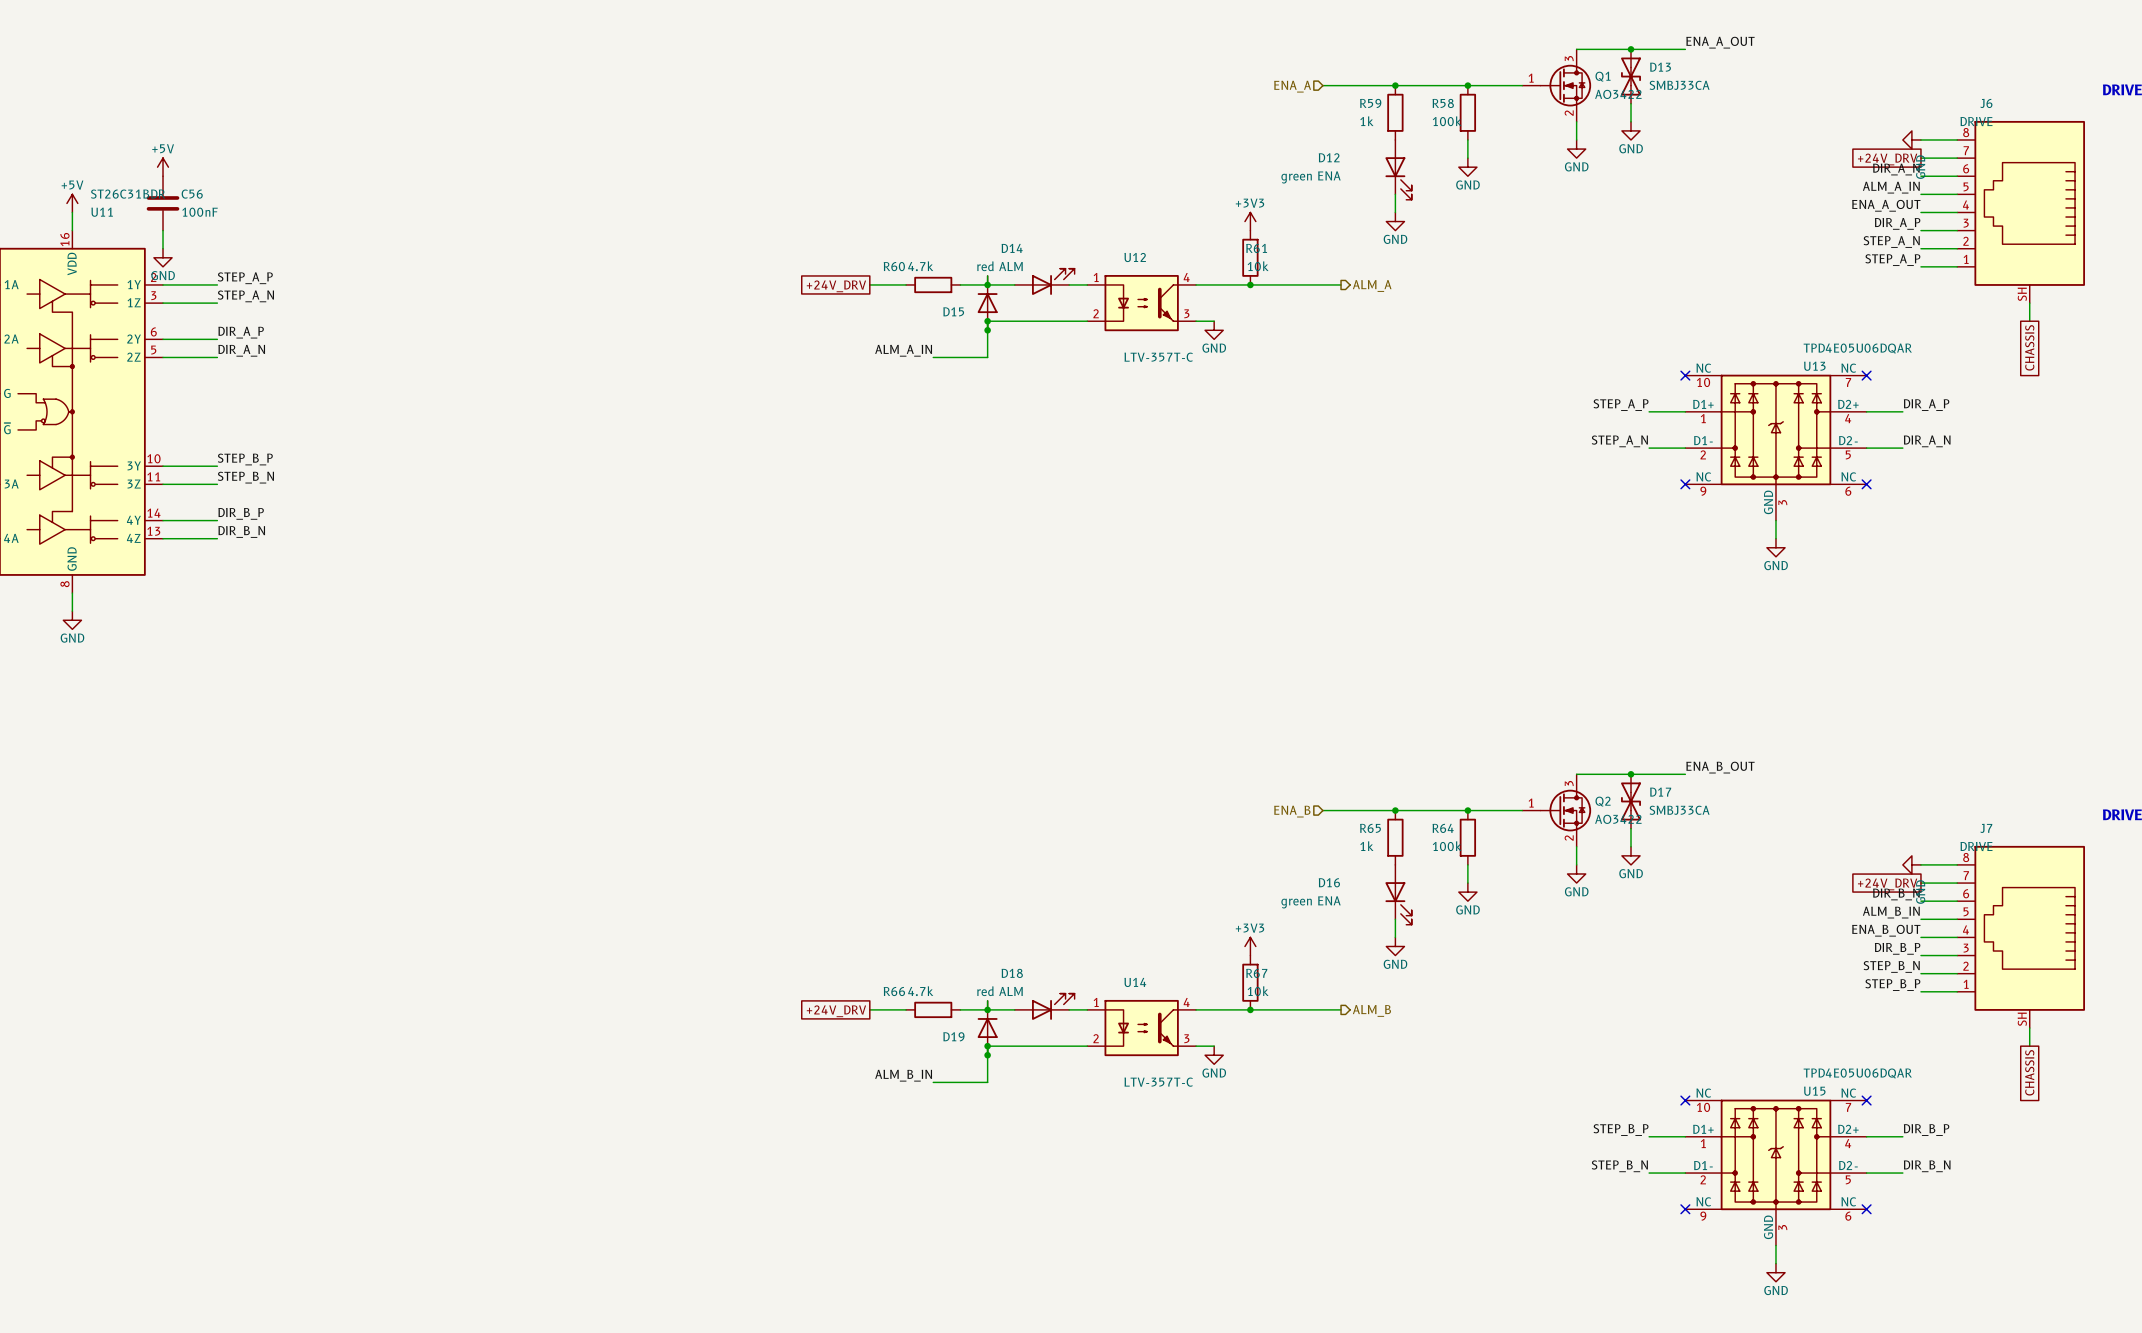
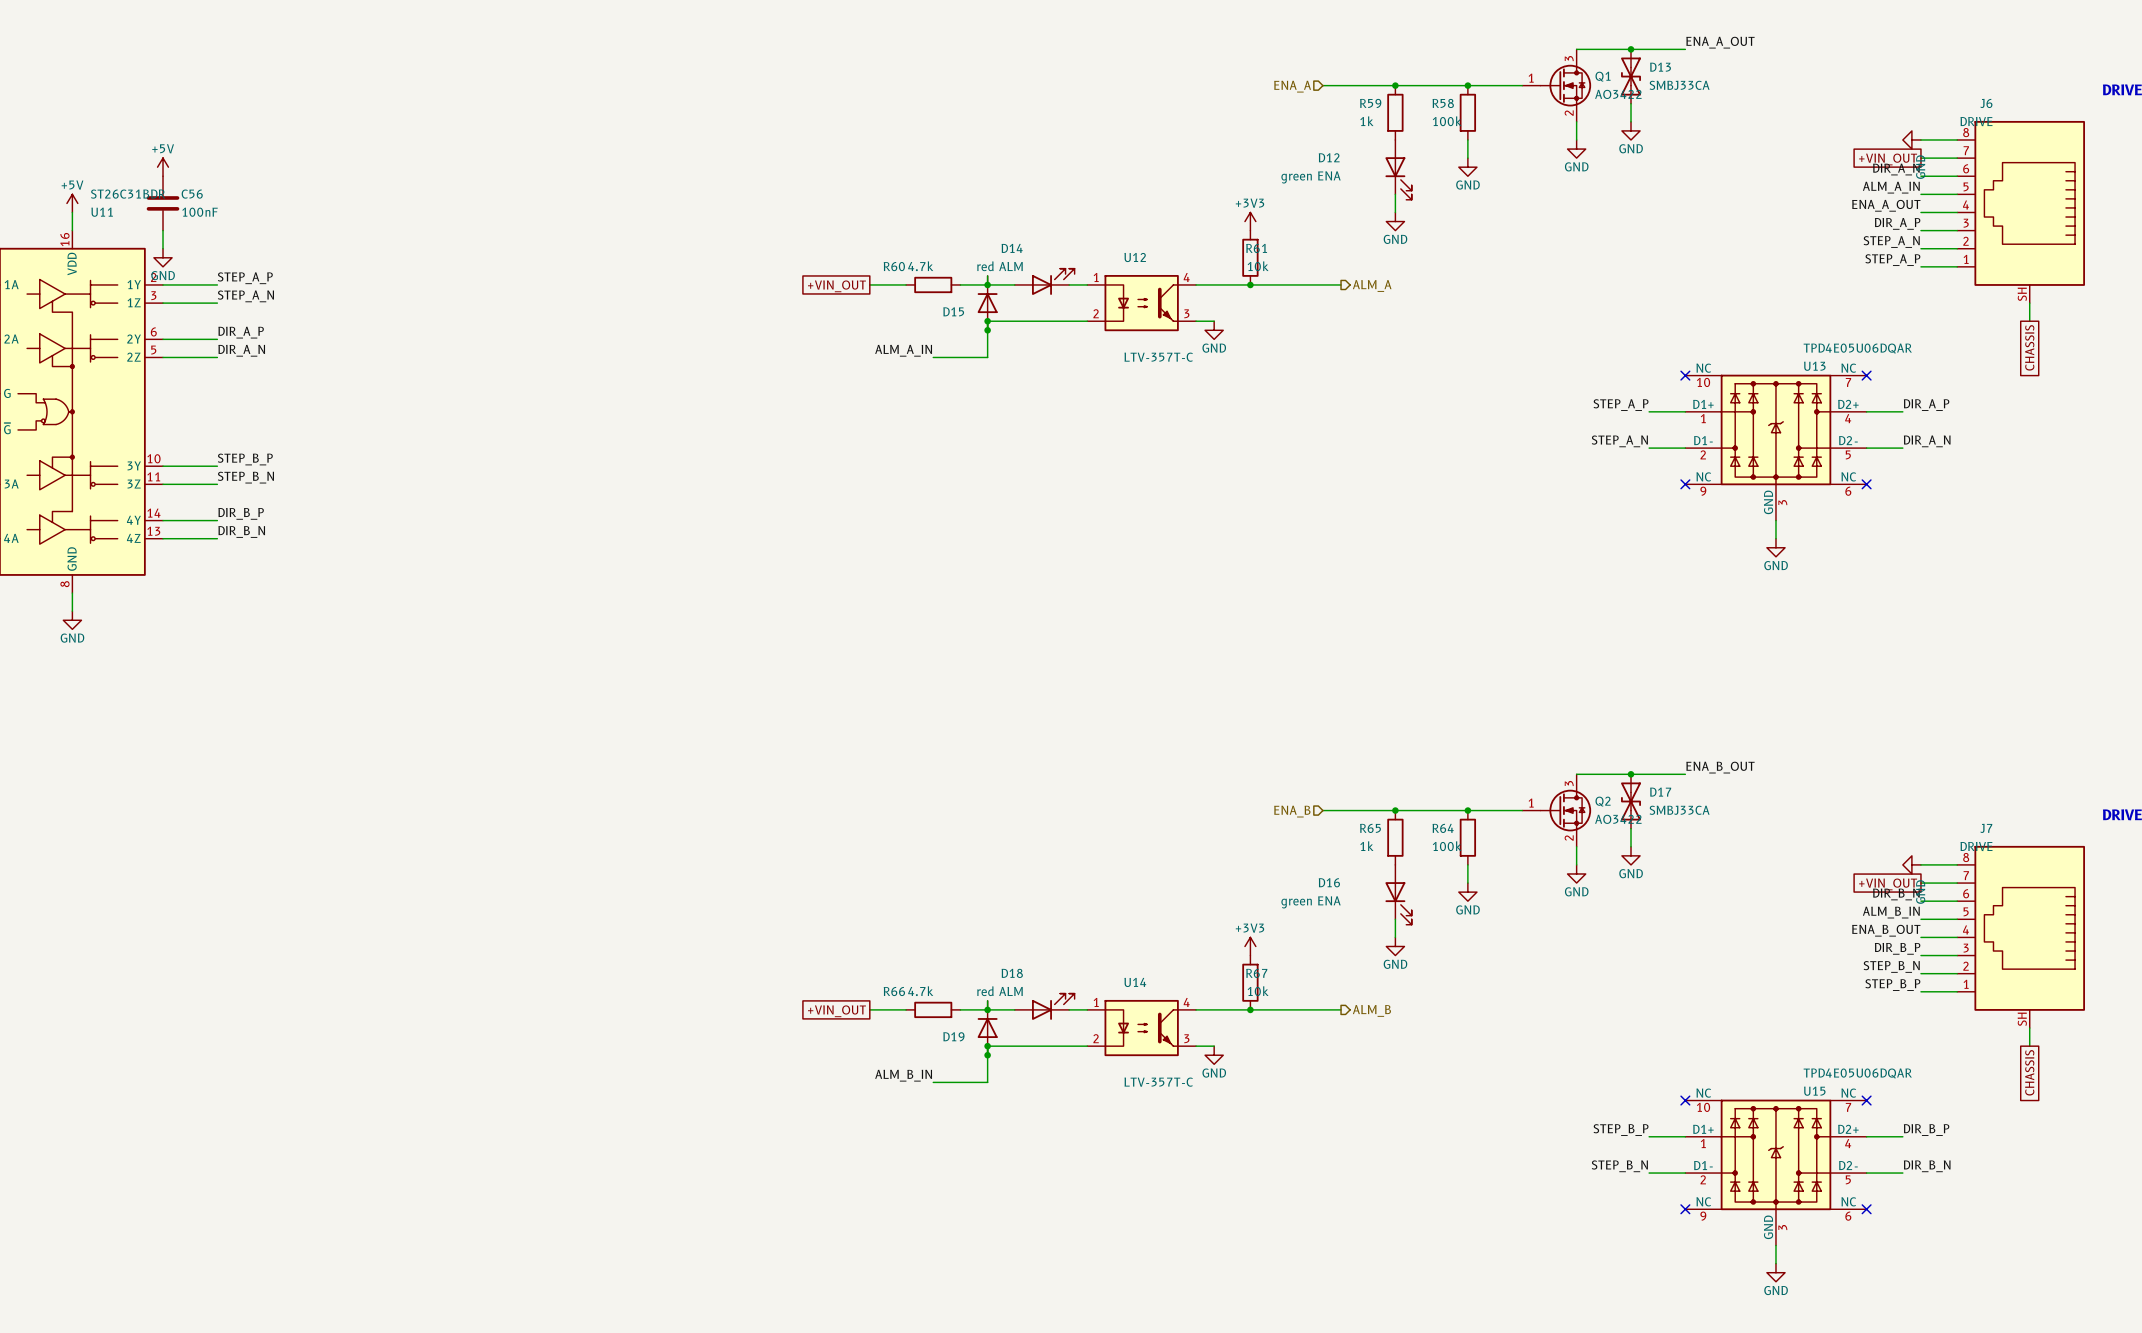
global label: +24V_DRV (1887, 159) -> +VIN_OUT (1888, 159)
global label: +24V_DRV (836, 286) -> +VIN_OUT (836, 286)
global label: +24V_DRV (1887, 884) -> +VIN_OUT (1888, 884)
global label: +24V_DRV (836, 1011) -> +VIN_OUT (836, 1011)

